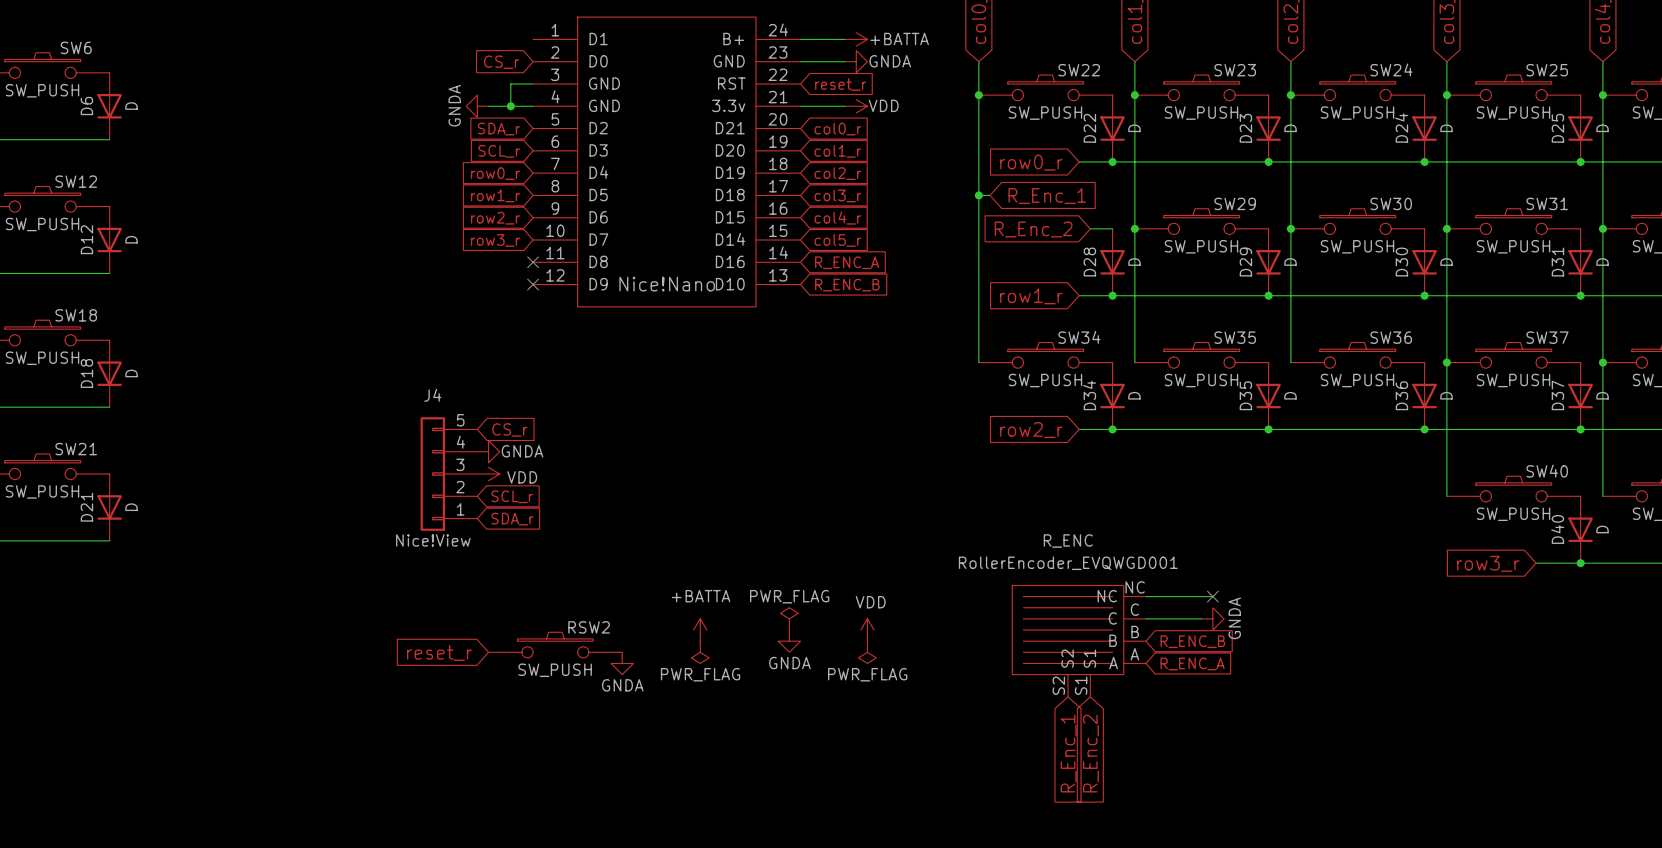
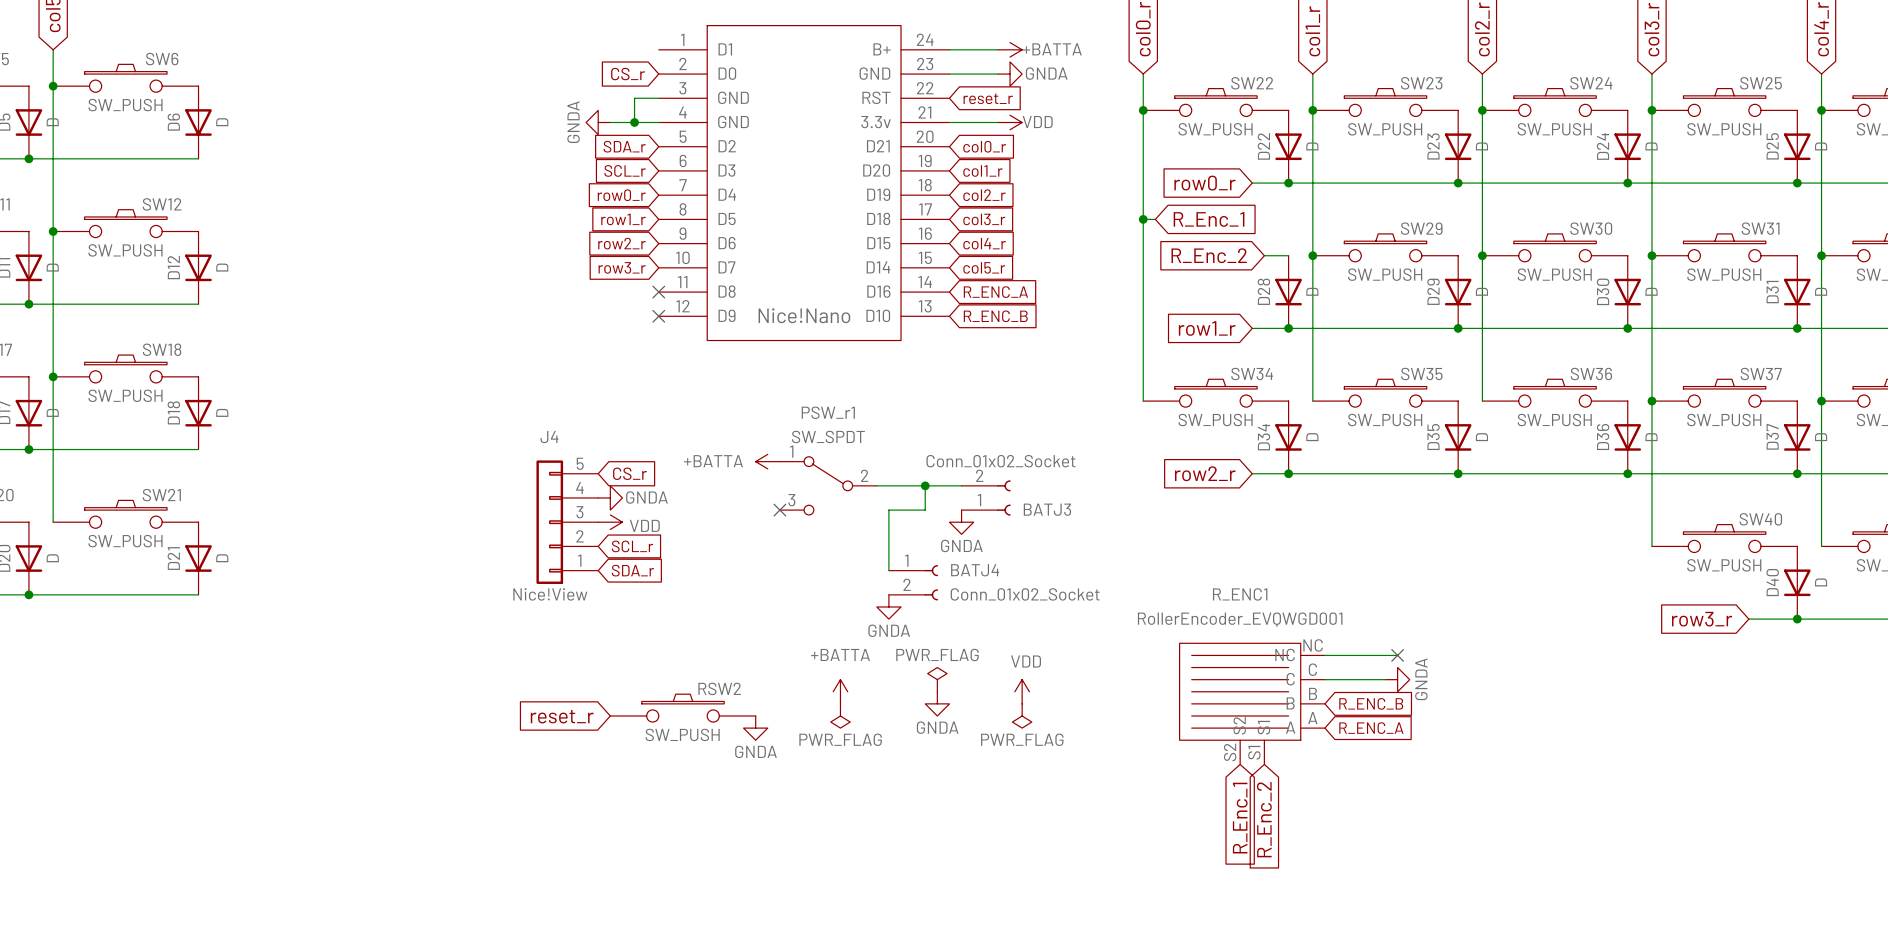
power symbol: none -> +BATTA (767, 461)
PSW_r1: none -> SW_SPDT (828, 485)
wire: none -> (876, 485) (961, 485)
wire: none -> (925, 485) (925, 510) (888, 510) (888, 570)
junction: none -> (925, 485)
BATJ3: none -> Conn_01x02_Socket (986, 497)
no-connect mark: none -> (779, 510)
power symbol: none -> GNDA (961, 522)
BATJ4: none -> Conn_01x02_Socket (913, 582)
R_ENC name: R_ENC (1068, 541) -> R_ENC1 (1240, 594)
power symbol: none -> GNDA (888, 606)

